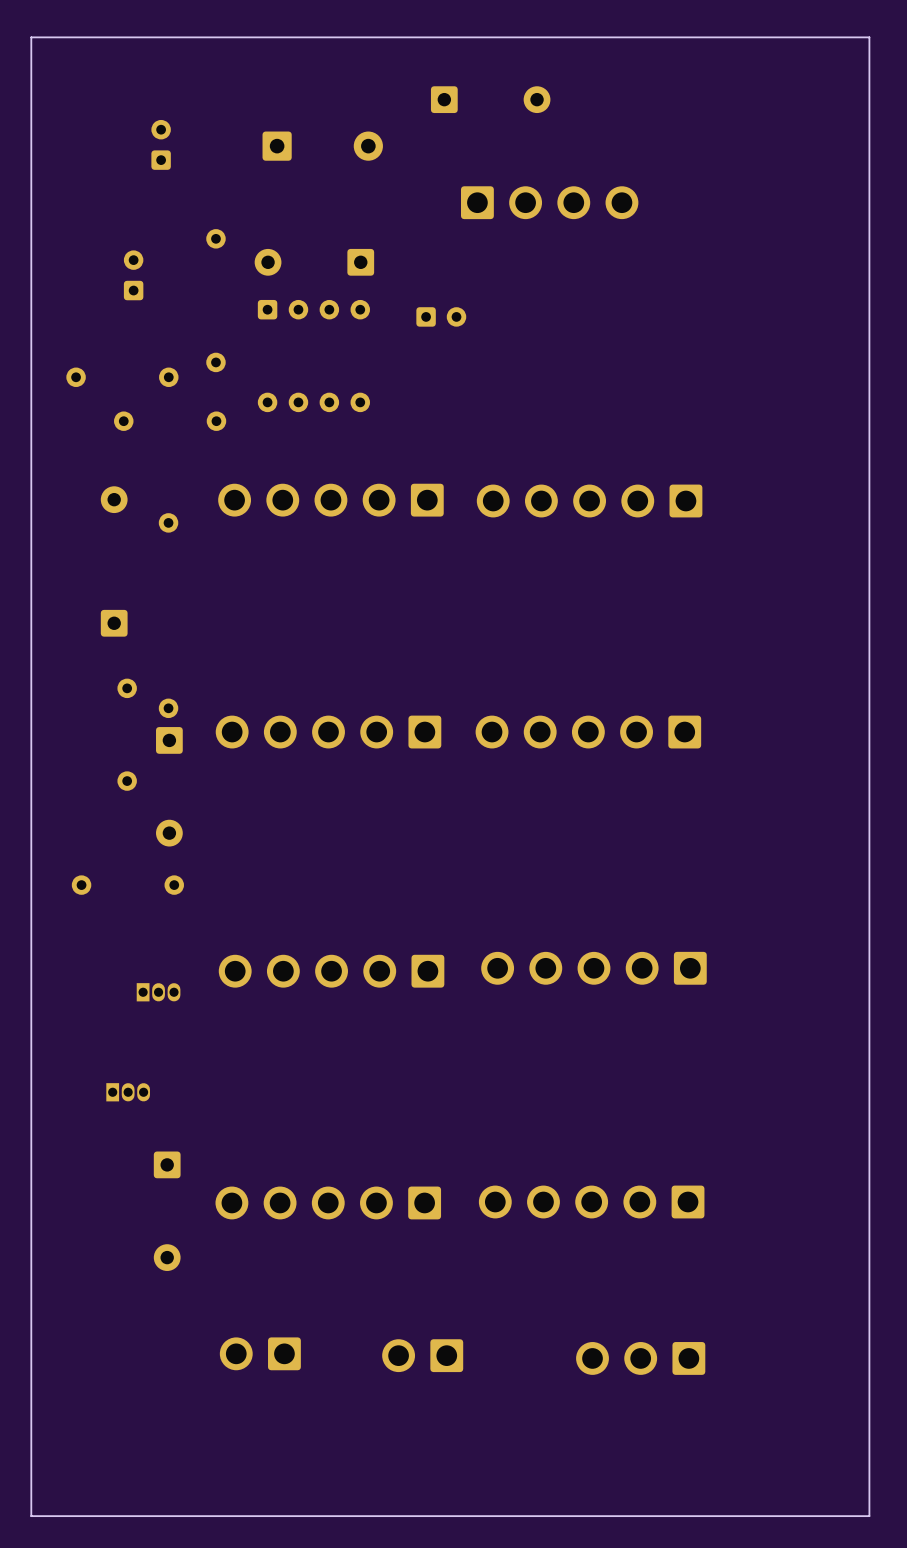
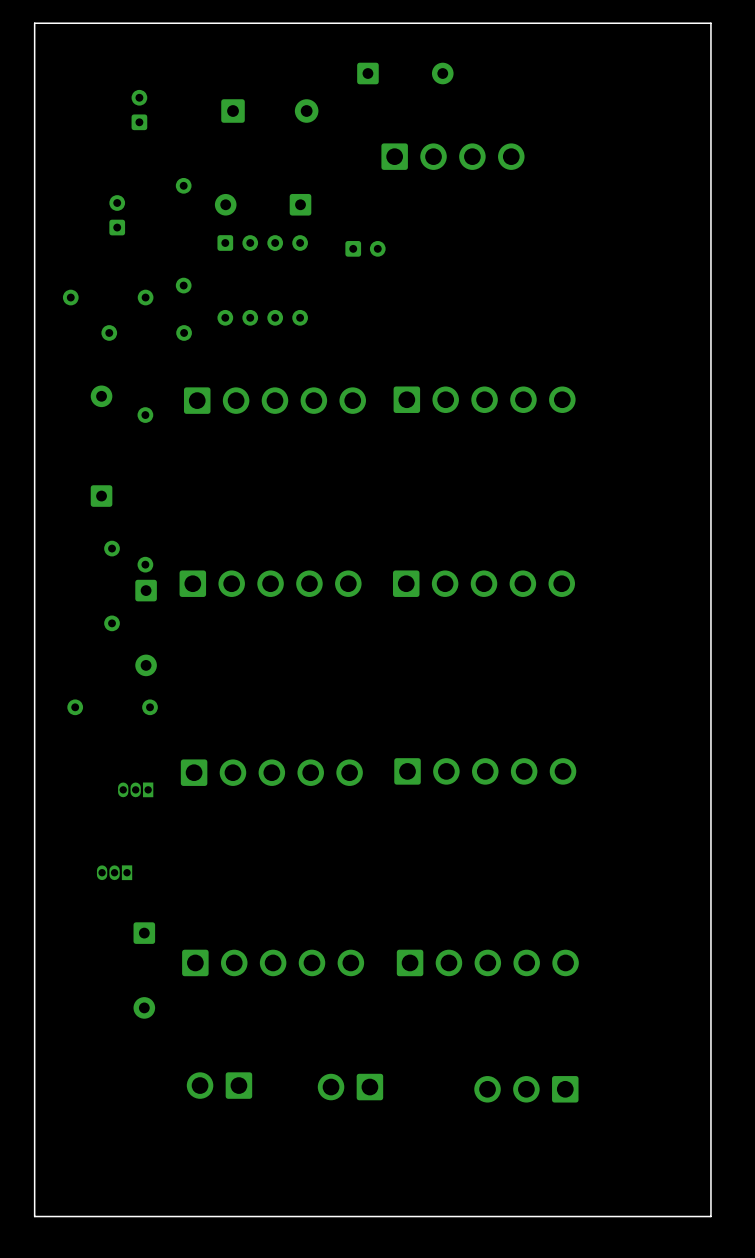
part rotation: 0° (330, 500) -> 180° (274, 400)
part rotation: 0° (589, 501) -> 180° (484, 399)
part rotation: 0° (328, 732) -> 180° (270, 583)
part rotation: 0° (588, 732) -> 180° (483, 583)
part rotation: 0° (593, 968) -> 180° (485, 771)
part rotation: 0° (331, 971) -> 180° (271, 772)
part rotation: 0° (158, 992) -> 180° (135, 789)
part rotation: 0° (128, 1092) -> 180° (114, 872)
part rotation: 0° (328, 1202) -> 180° (273, 962)
part rotation: 0° (591, 1202) -> 180° (487, 962)

